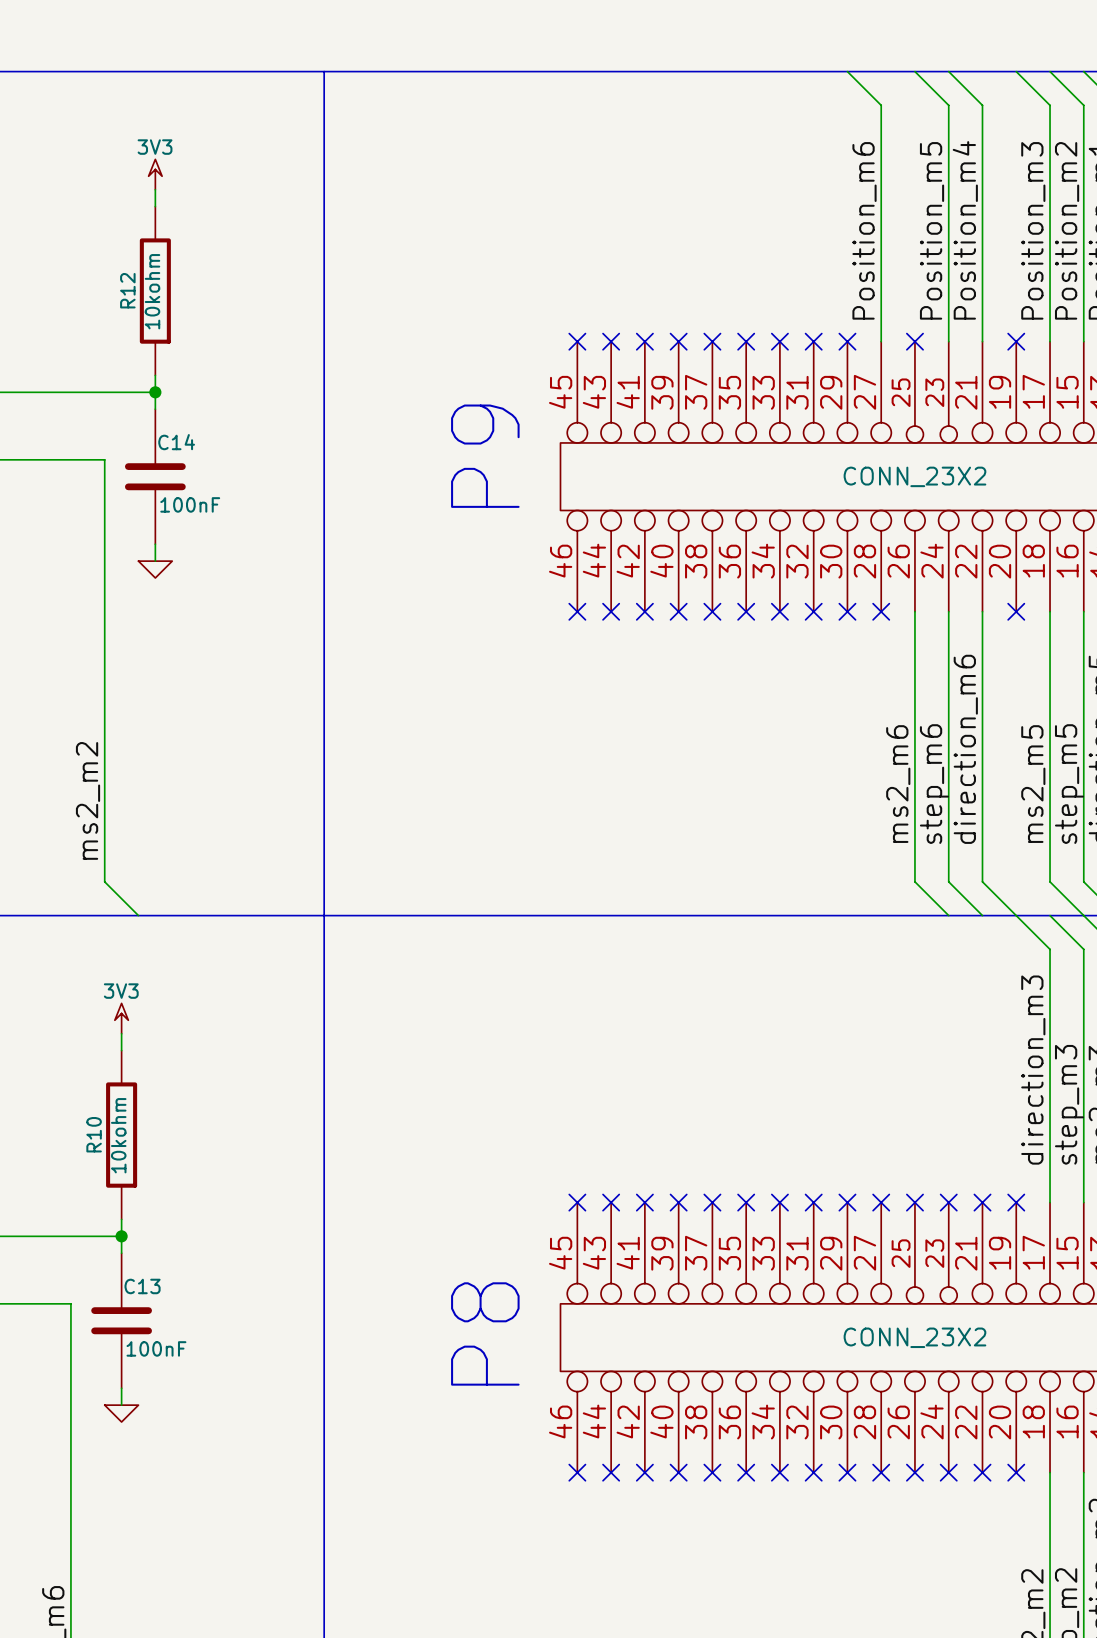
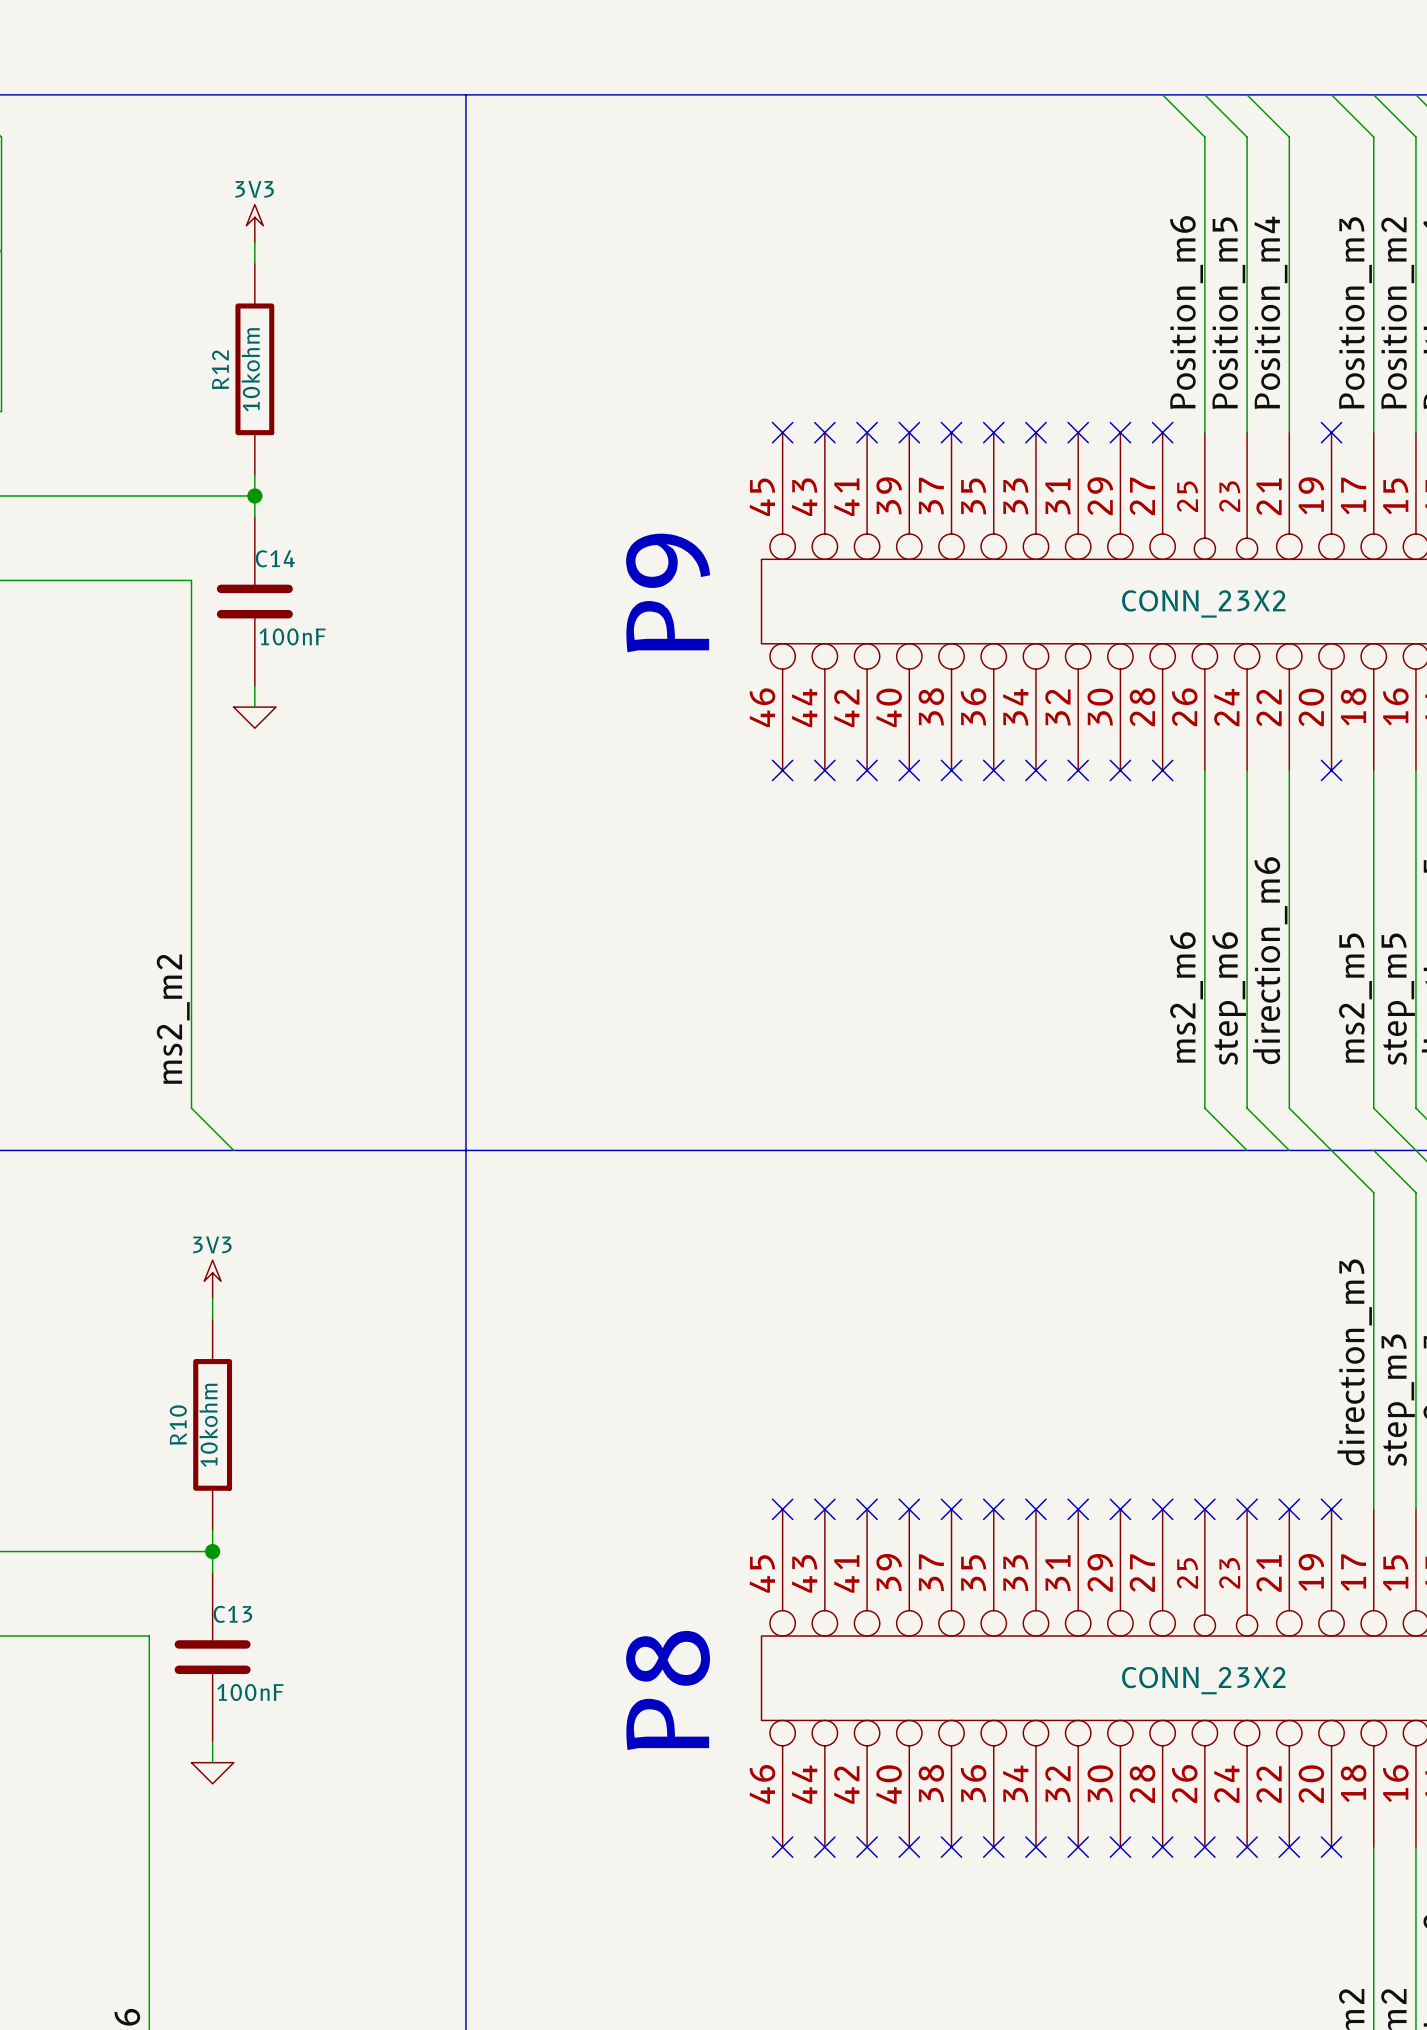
wire: (847, 71) (881, 105) (881, 341) -> (1162, 94) (1204, 137) (1204, 432)
label position: Position_m6 (864, 230) -> Position_m6 (1186, 312)
no-connect mark position: (914, 341) -> (1162, 432)

